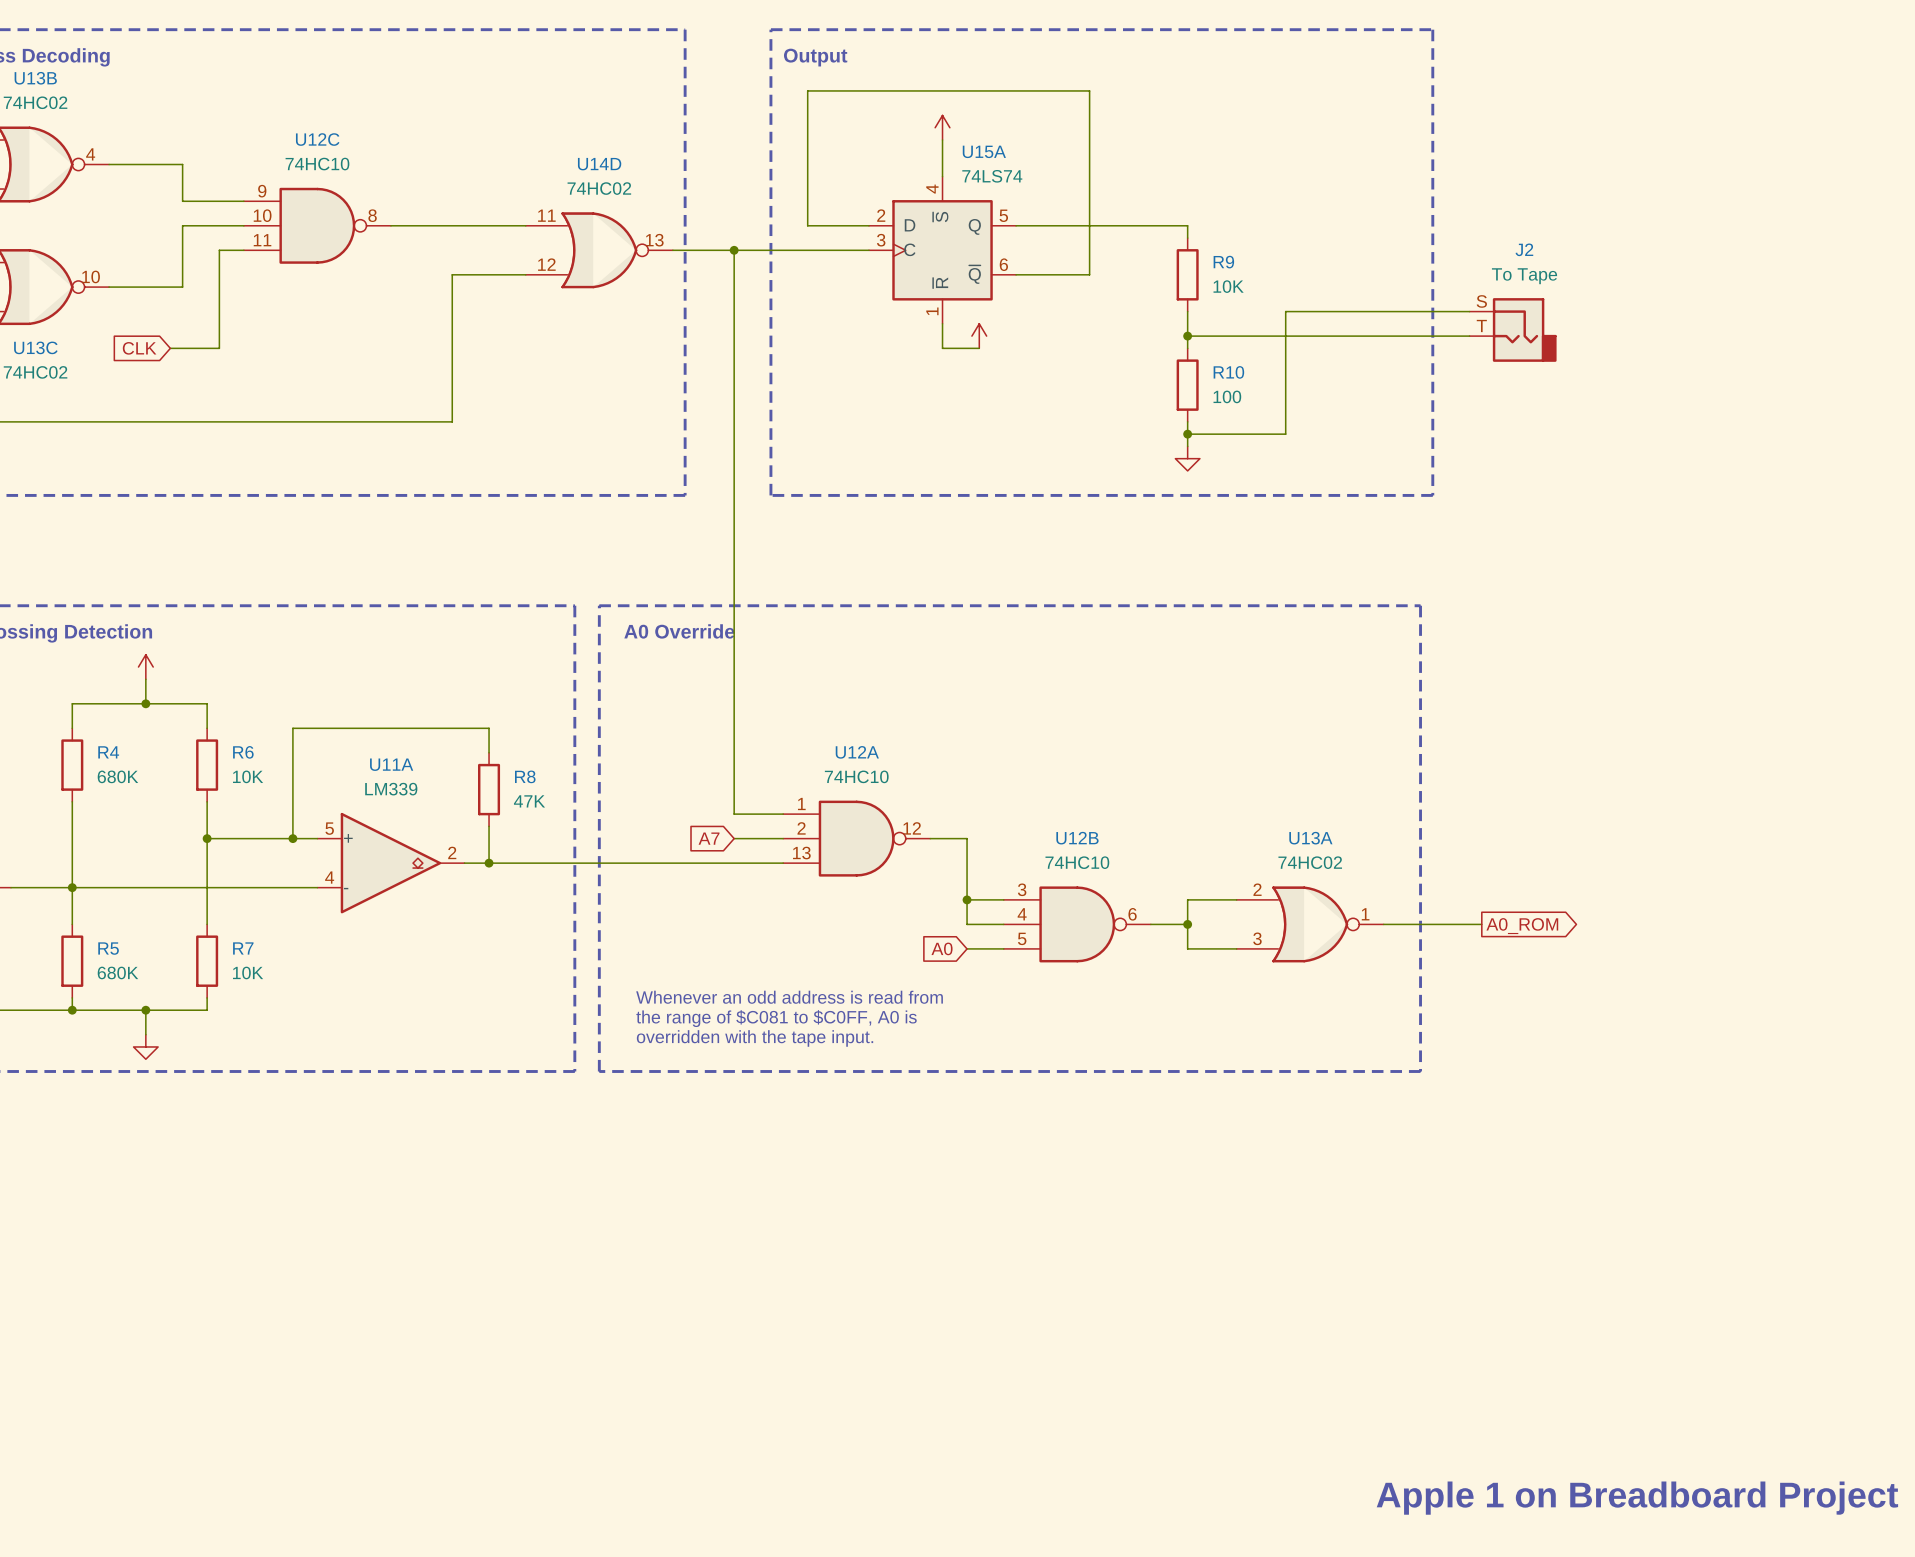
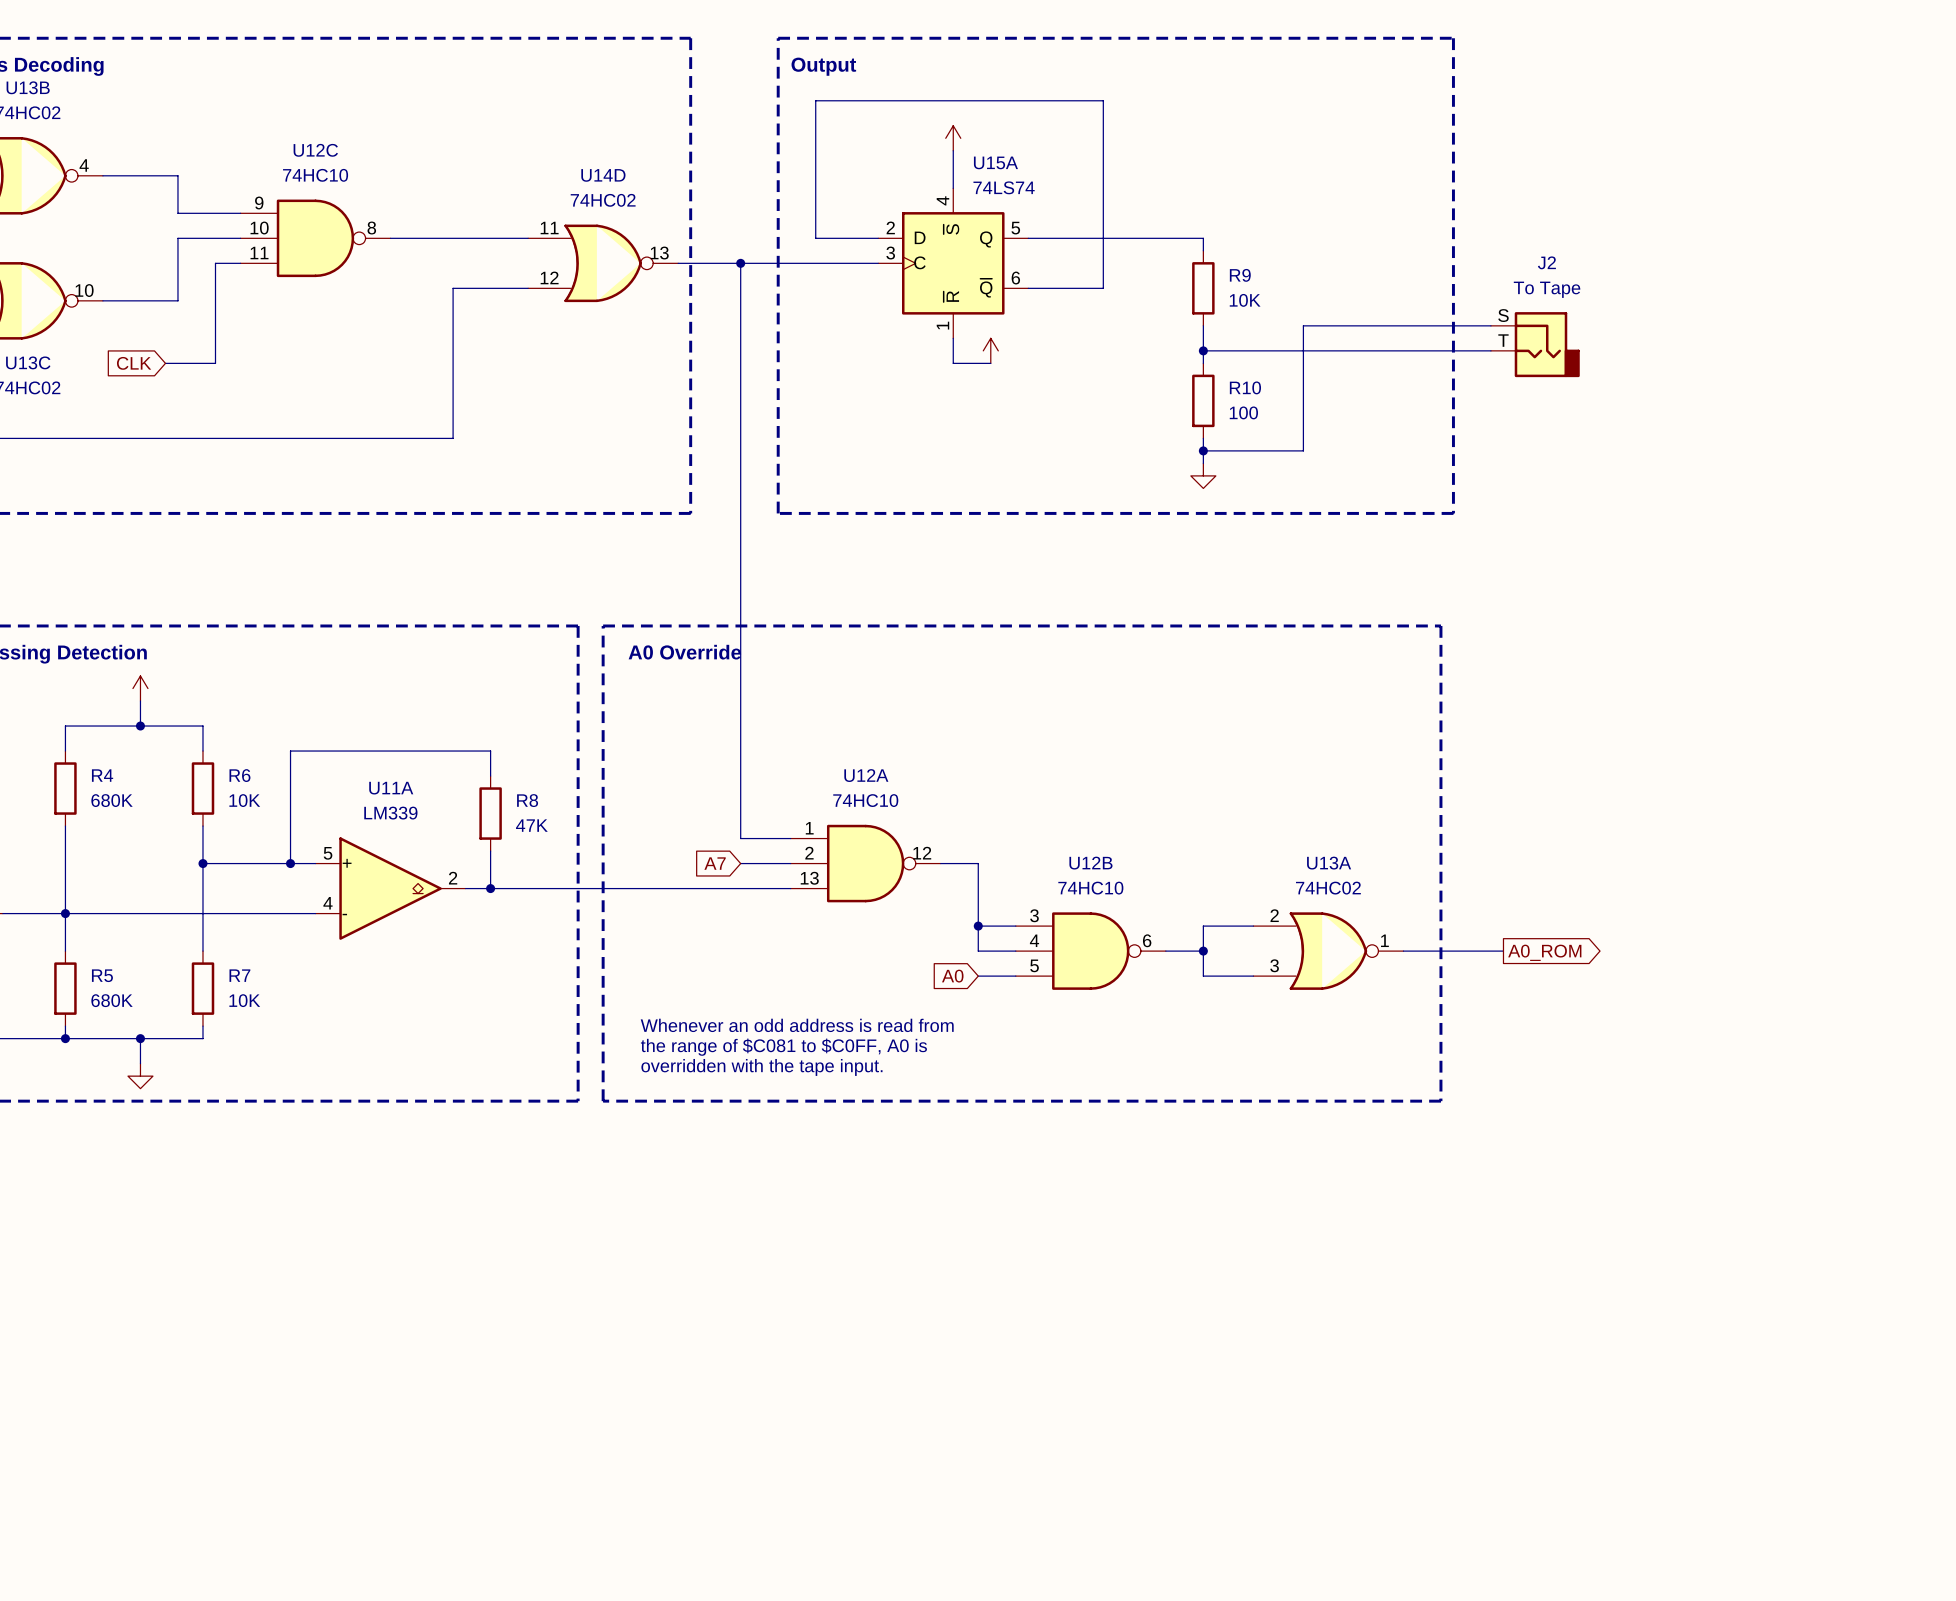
text: Apple 1 on Breadboard Project (1637, 1498) -> none

